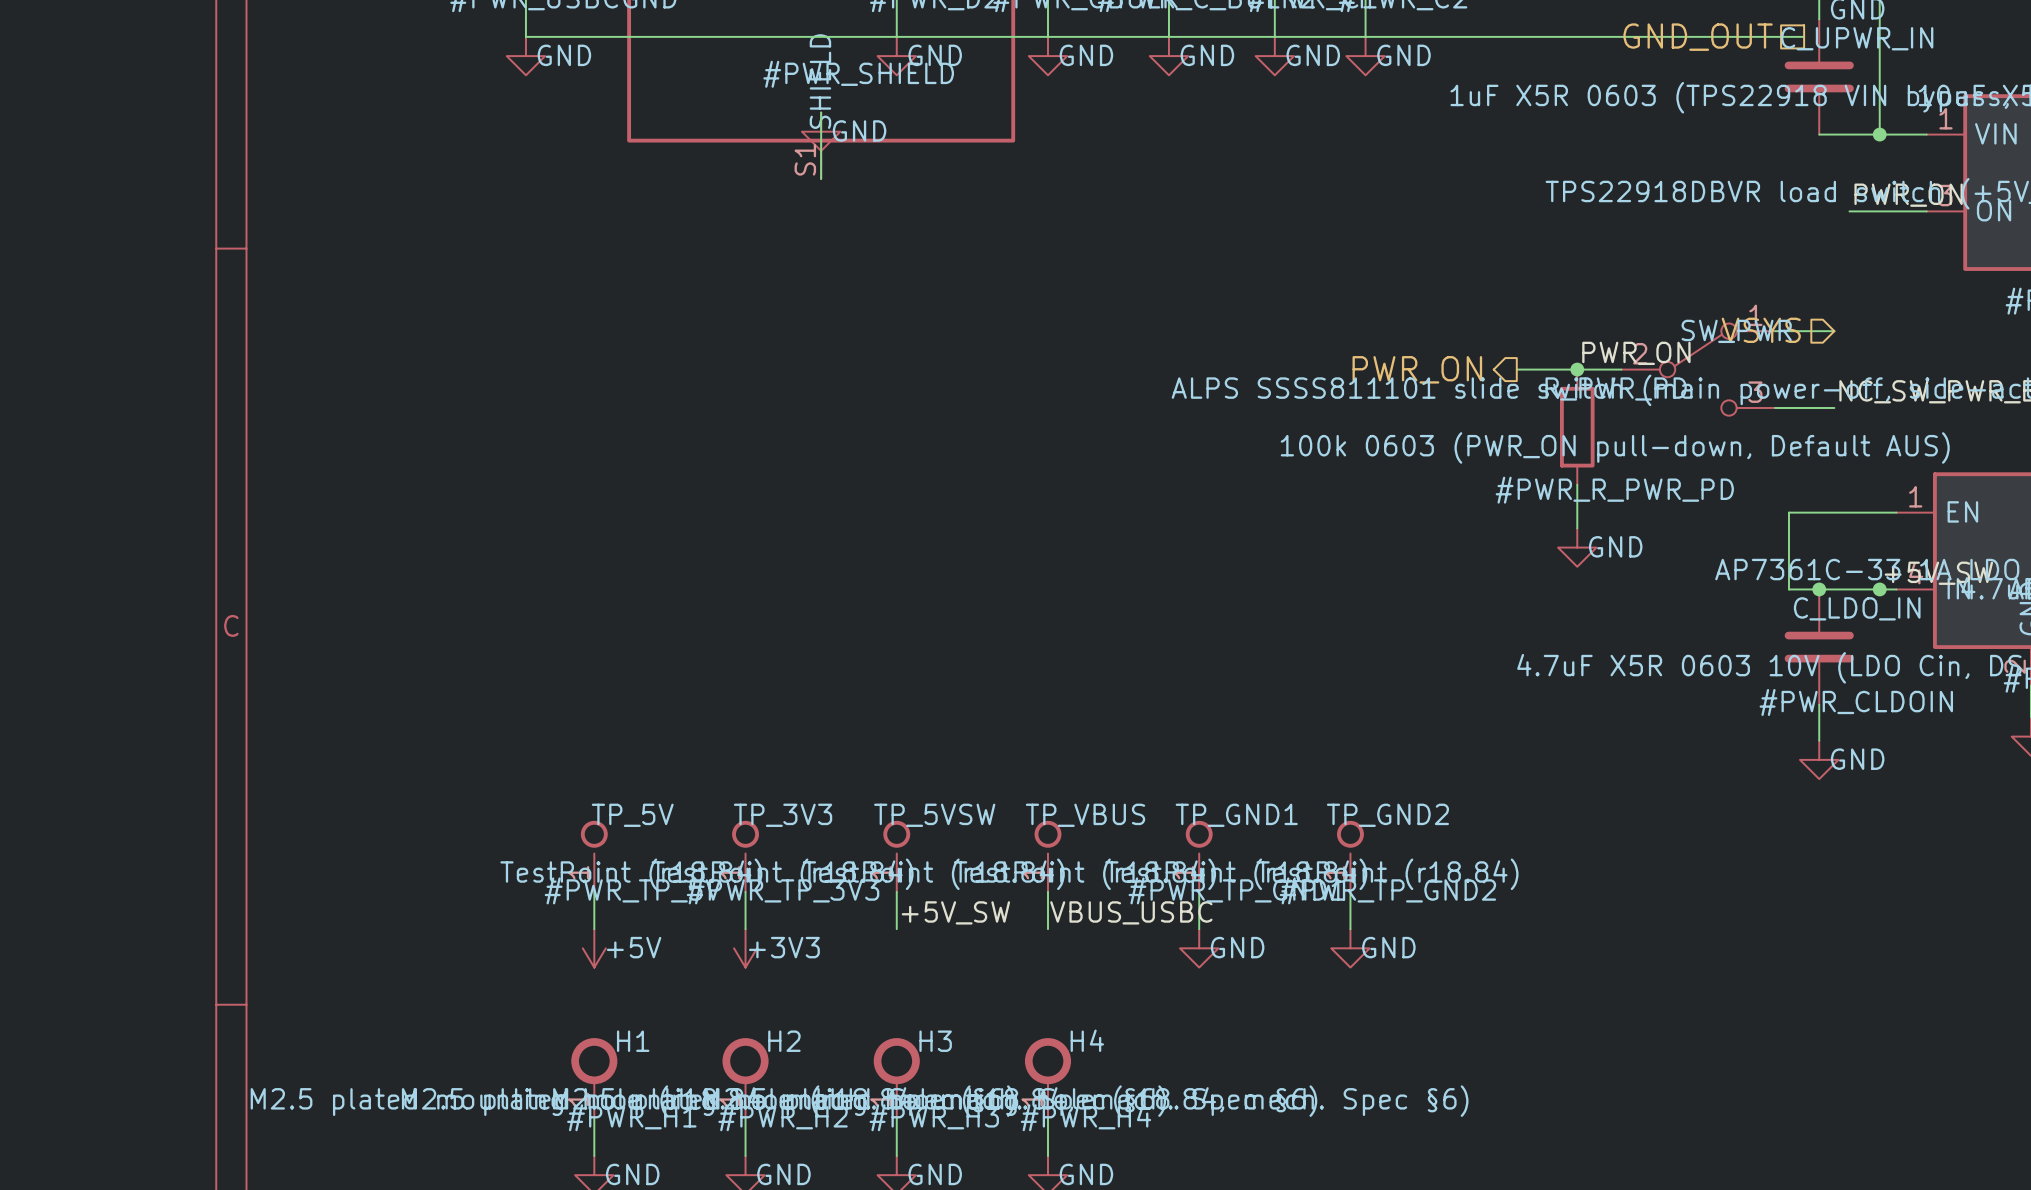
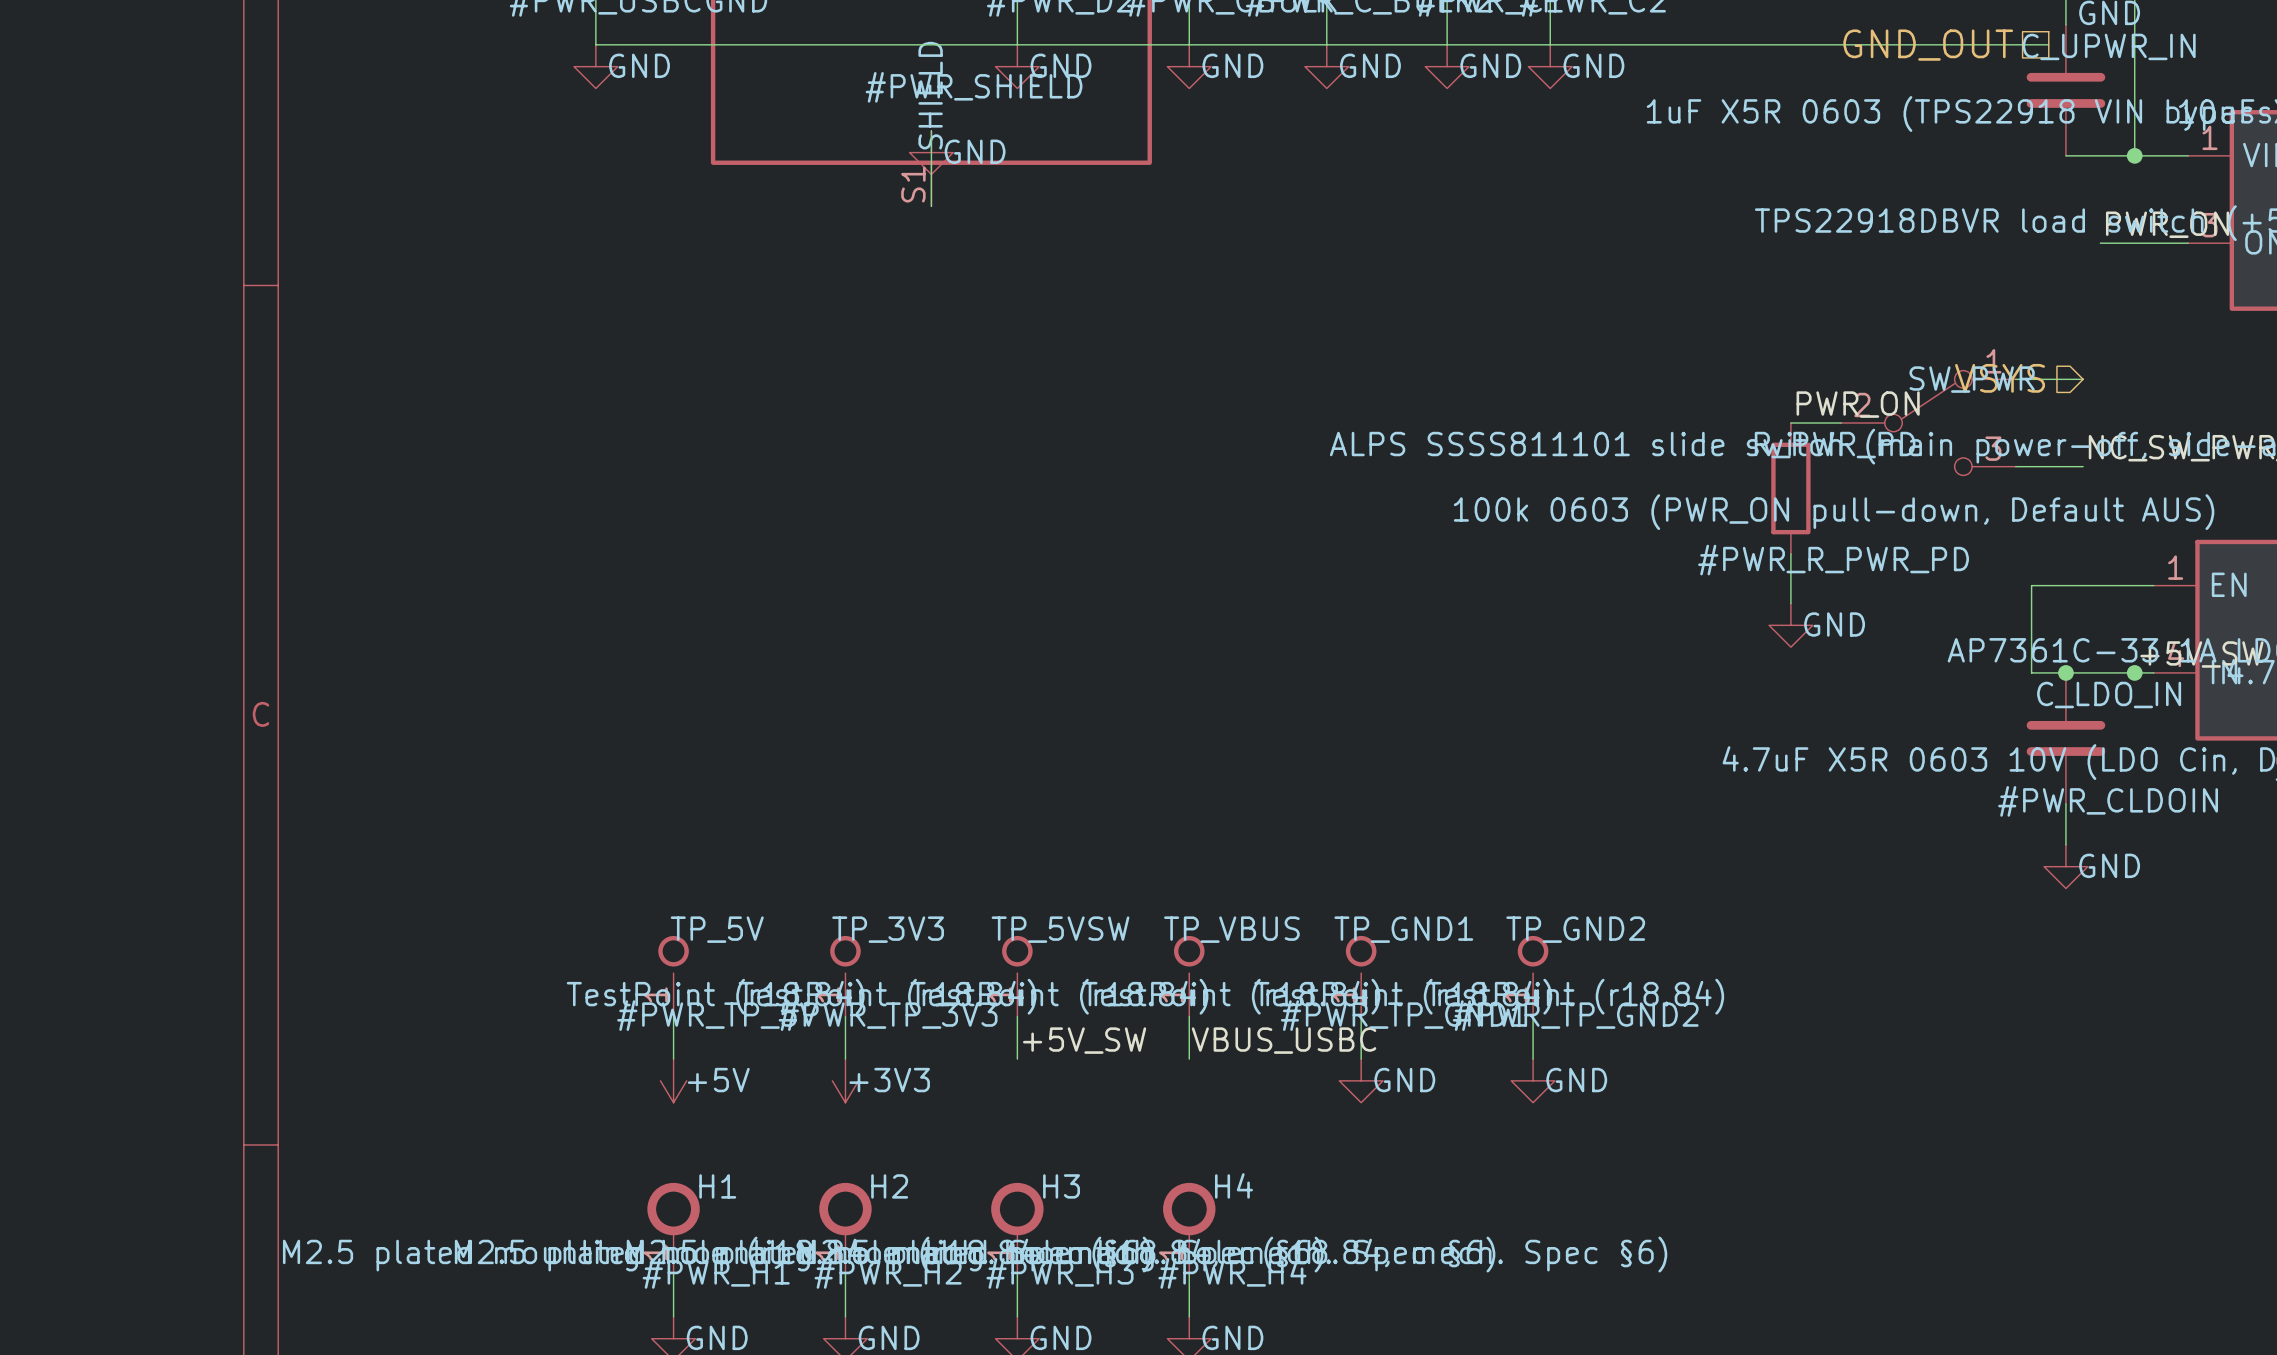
hierarchical label: PWR_ON (1417, 369) -> none
wire: (1516, 369) (1577, 369) -> none
junction: (1577, 369) -> none

